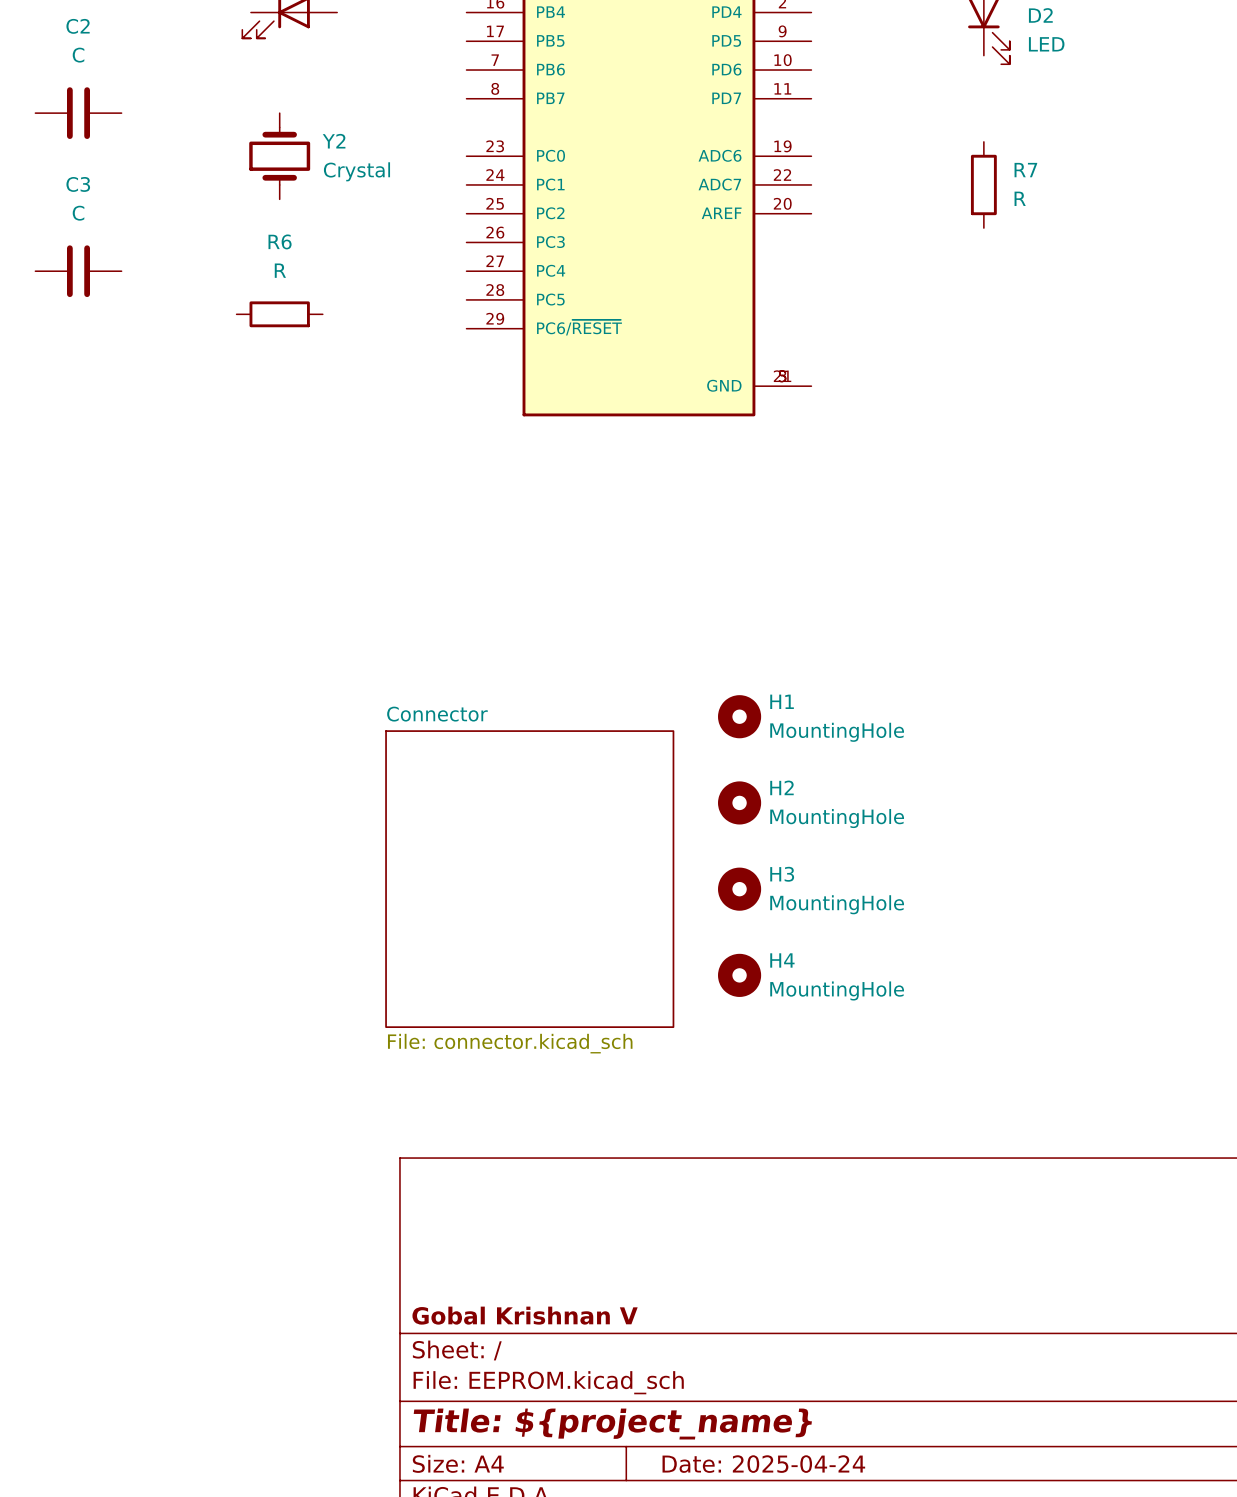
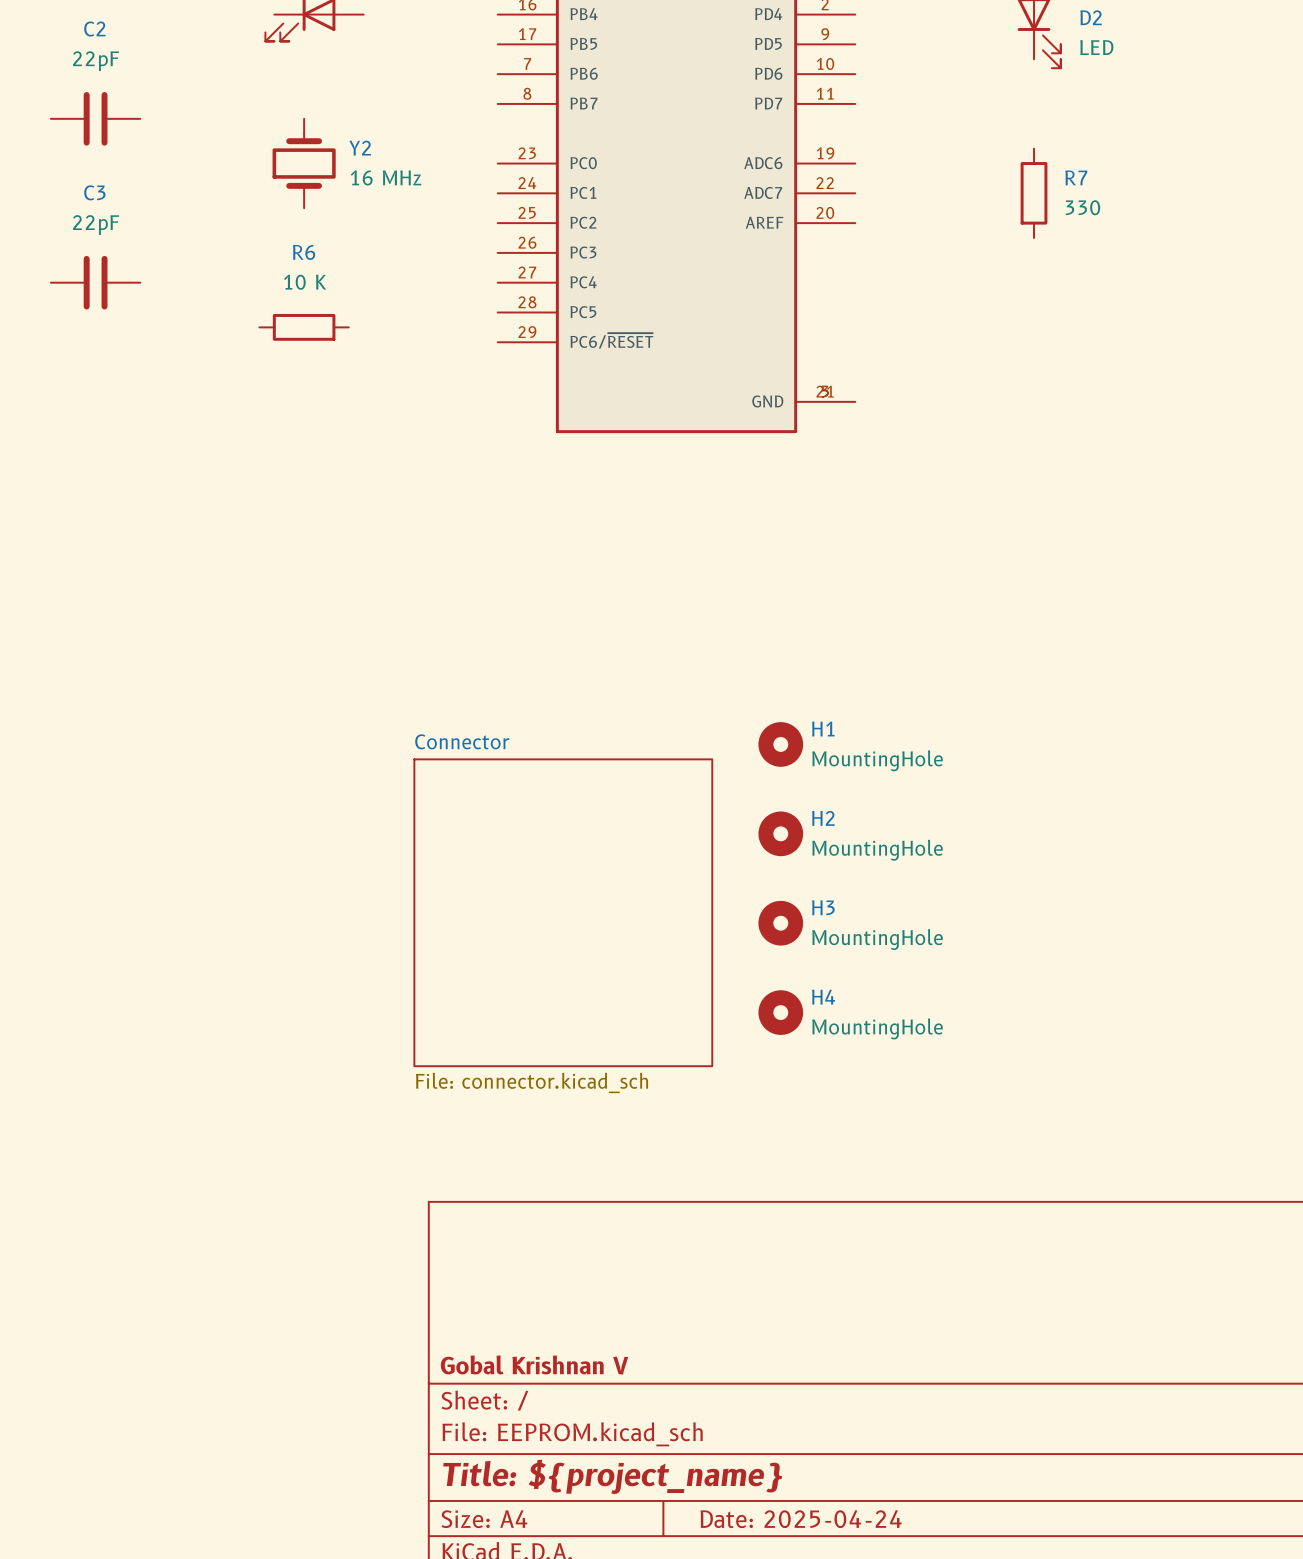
C2 value: C (78, 55) -> 22pF (96, 61)
Y2 value: Crystal (356, 171) -> 16 MHz (386, 177)
R7 value: R (1020, 198) -> 330 (1082, 207)
C3 value: C (78, 213) -> 22pF (96, 225)
R6 value: R (280, 270) -> 10 K (305, 282)

